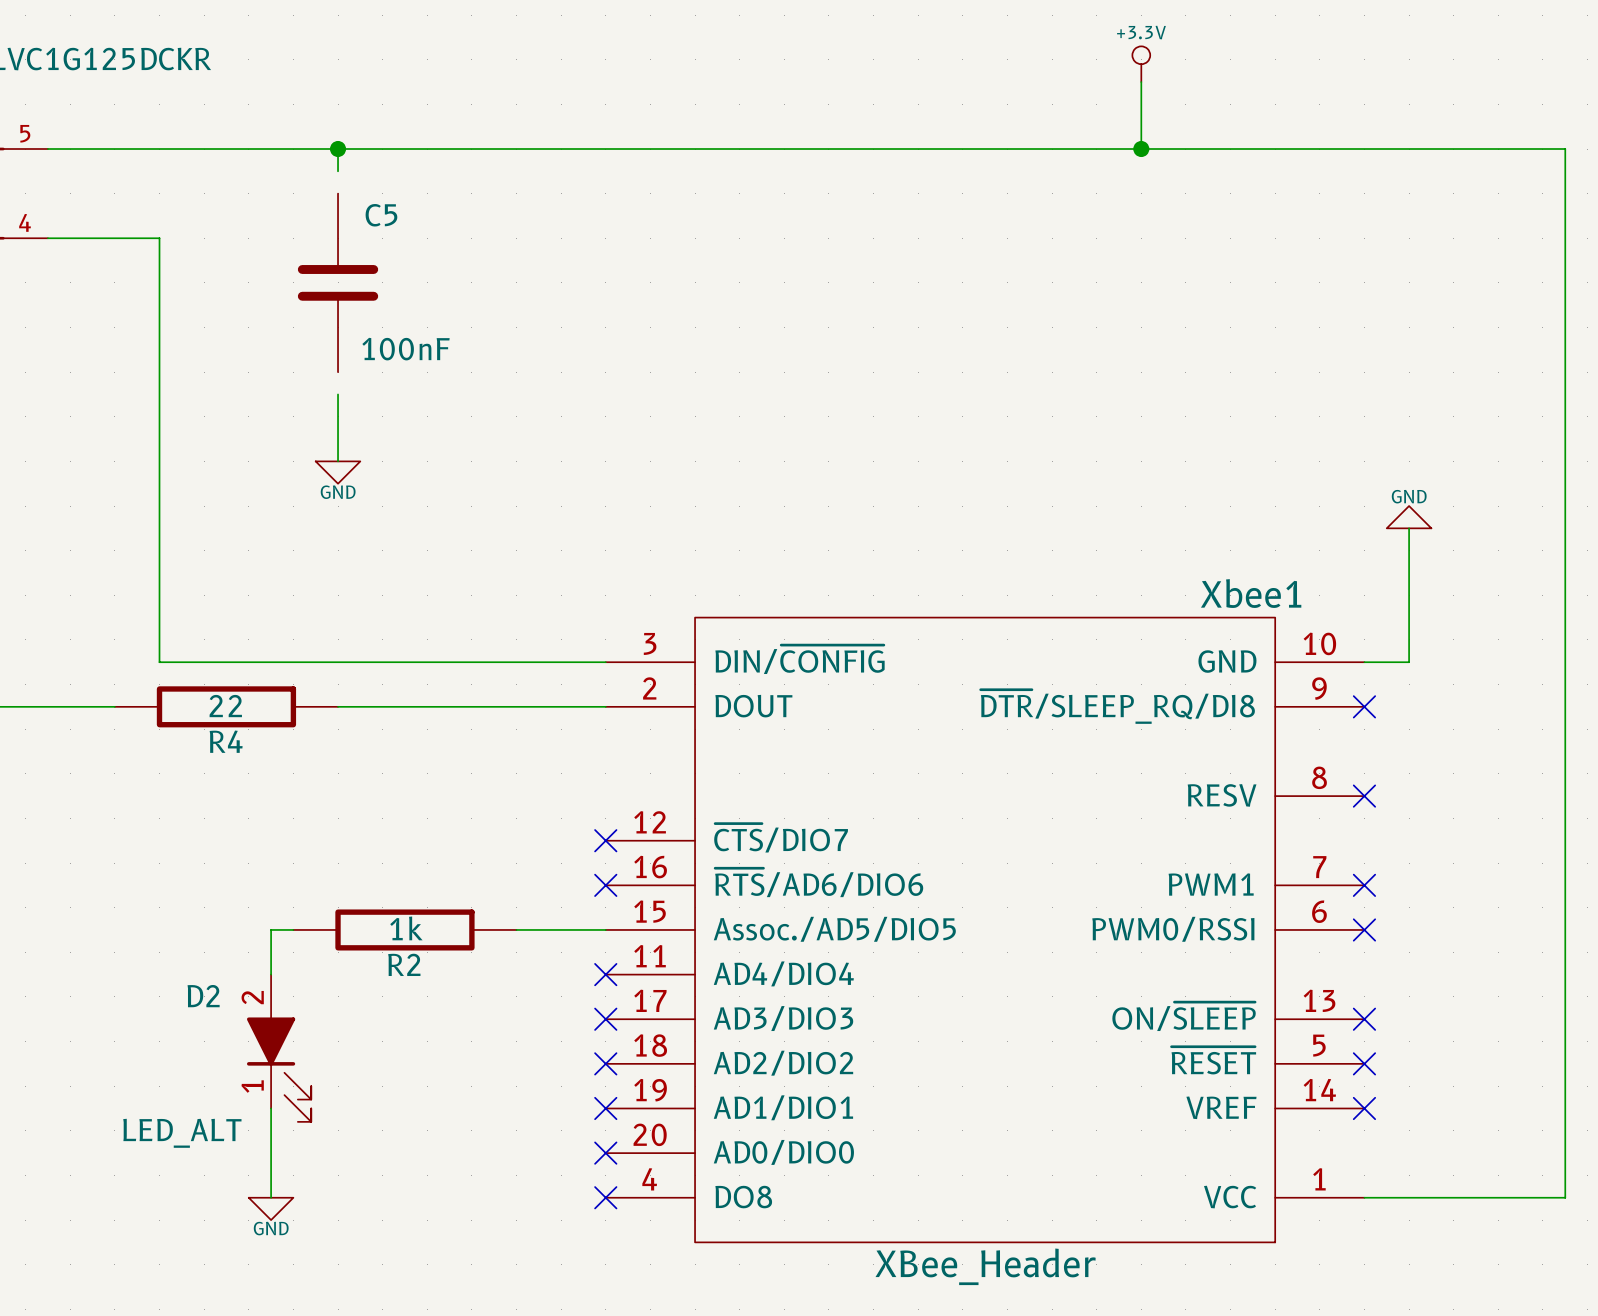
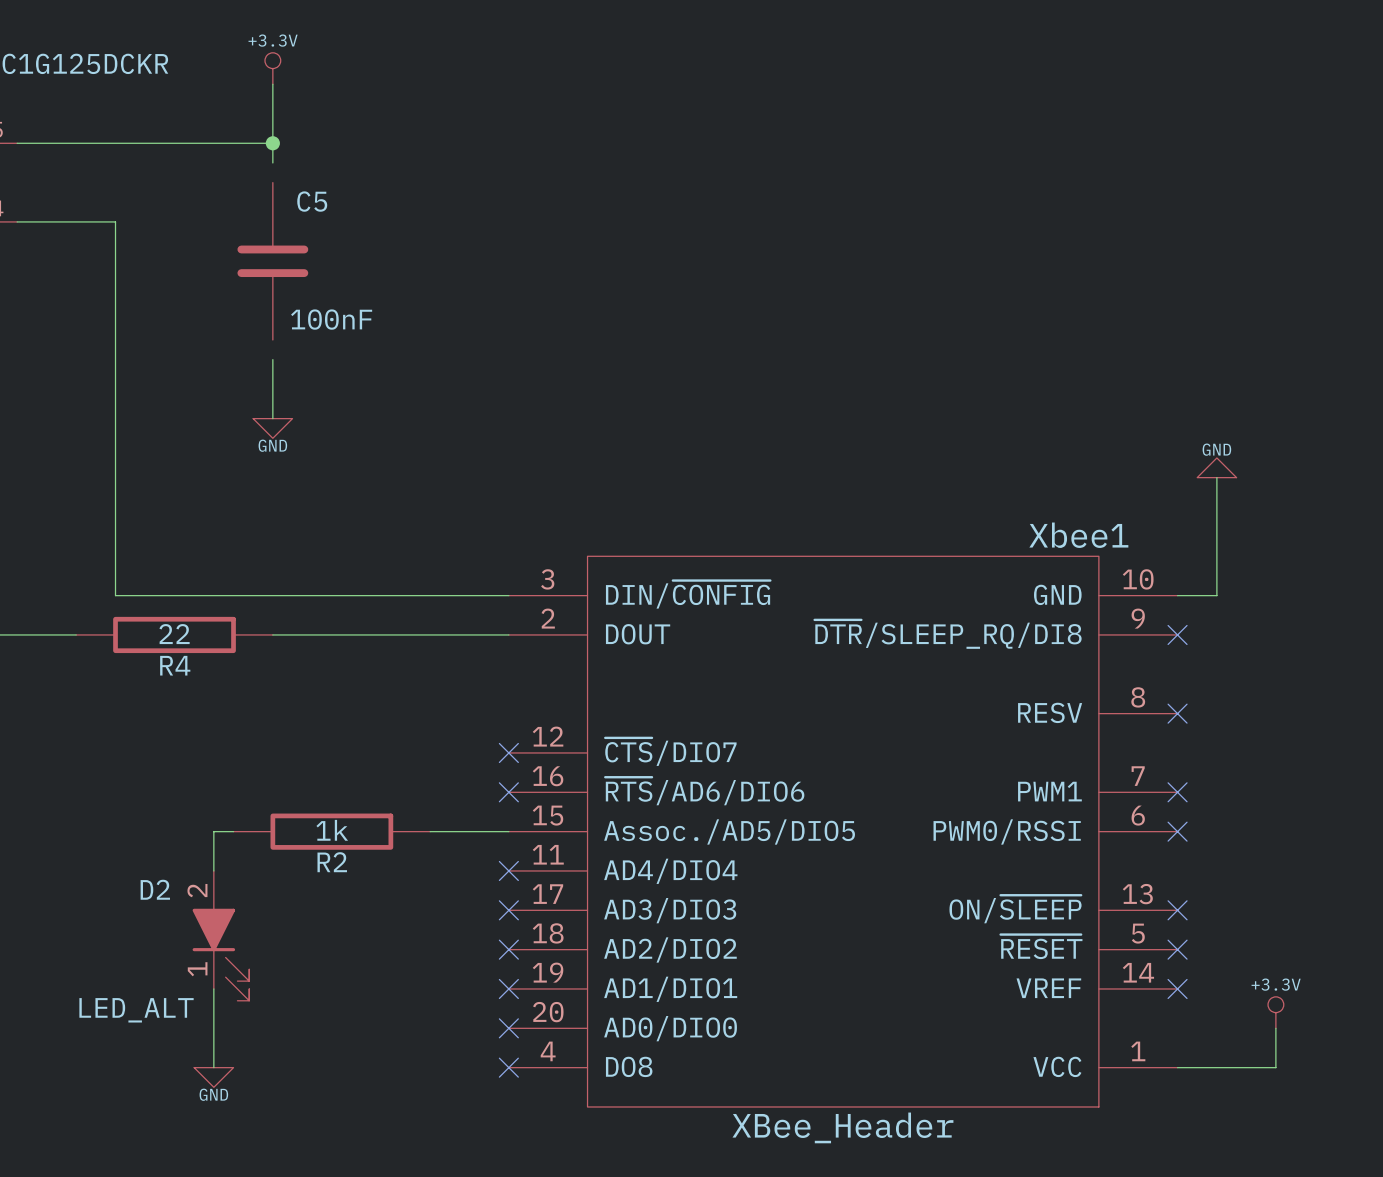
power symbol: none -> +3.3V (272, 68)
power symbol: +3.3V (1141, 64) -> none
wire: none -> (272, 84) (272, 143)
wire: (1141, 82) (1141, 149) -> none
wire: (338, 149) (1565, 149) (1565, 1197) (1476, 1197) -> (1275, 1028) (1275, 1067)
junction: (1141, 149) -> none
power symbol: none -> +3.3V (1275, 1012)

